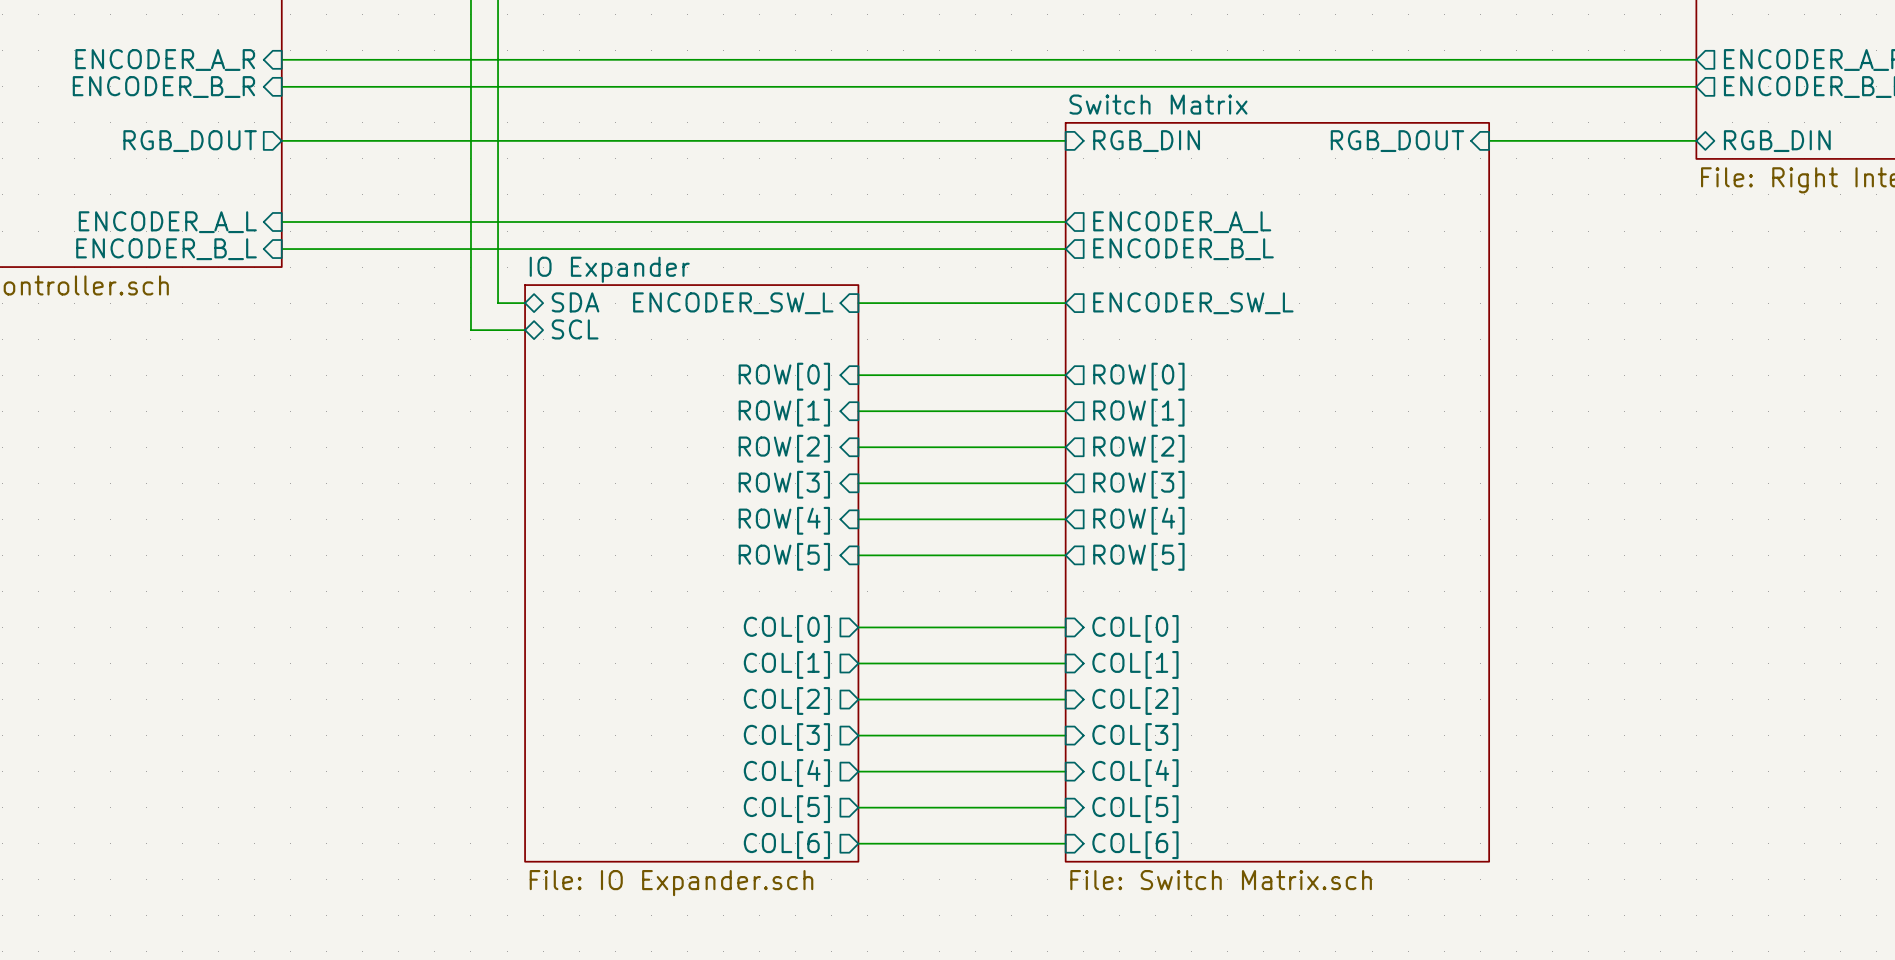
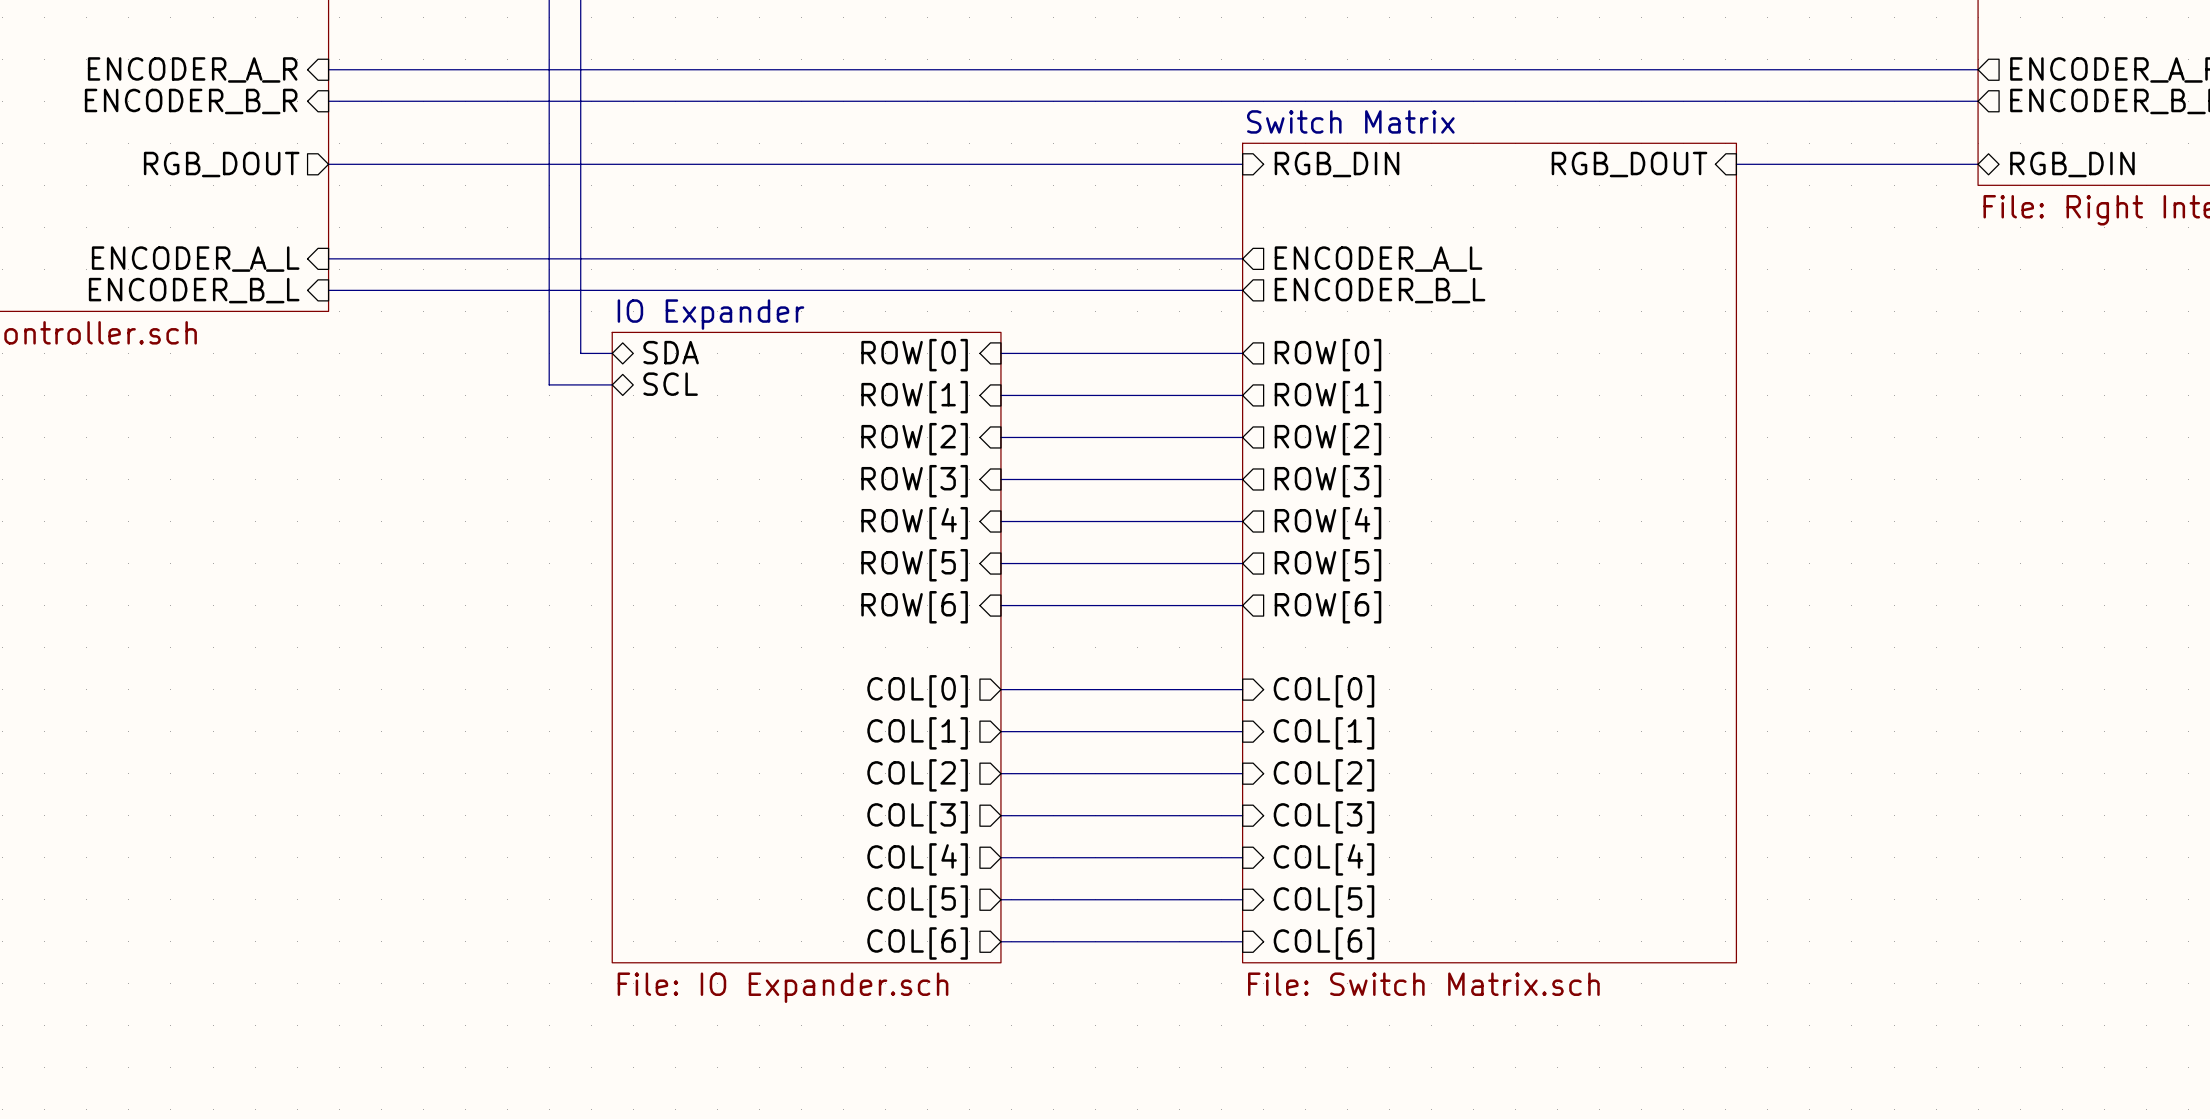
sheet pin: ENCODER_SW_L (733, 303) -> ROW[0] (914, 355)
sheet pin: ENCODER_SW_L (1193, 303) -> ROW[0] (1327, 355)
wire: none -> (1000, 395) (1242, 395)
sheet pin: none -> ROW[1] (914, 397)
sheet pin: none -> ROW[1] (1327, 397)
sheet pin: ROW[0] (784, 376) -> ROW[2] (914, 439)
sheet pin: ROW[0] (1138, 376) -> ROW[2] (1327, 439)
sheet pin: ROW[1] (784, 412) -> ROW[3] (914, 481)
sheet pin: ROW[1] (1138, 412) -> ROW[3] (1327, 481)
sheet pin: ROW[2] (784, 448) -> ROW[4] (914, 523)
sheet pin: ROW[2] (1138, 448) -> ROW[4] (1327, 523)
sheet Switch Matrix: none -> File: Switch Matrix.sch (1489, 553)
sheet pin: ROW[3] (784, 484) -> ROW[5] (914, 565)
sheet pin: ROW[3] (1138, 484) -> ROW[5] (1327, 565)
sheet Switch Matrix: File: Switch Matrix.sch (1277, 492) -> none
sheet pin: ROW[4] (784, 520) -> ROW[6] (914, 607)
sheet pin: ROW[4] (1138, 520) -> ROW[6] (1327, 607)
sheet IO Expander: none -> File: IO Expander.sch (806, 647)
wire: (858, 555) (1065, 555) -> (1000, 689) (1242, 689)
sheet pin: ROW[5] (784, 556) -> none
sheet pin: ROW[5] (1138, 556) -> none
sheet IO Expander: File: IO Expander.sch (691, 573) -> none
sheet pin: none -> COL[0] (917, 691)
sheet pin: none -> COL[0] (1323, 691)
sheet pin: COL[0] (786, 628) -> COL[1] (917, 733)
sheet pin: COL[0] (1135, 628) -> COL[1] (1323, 733)
sheet pin: COL[1] (786, 664) -> COL[2] (917, 775)
sheet pin: COL[1] (1135, 664) -> COL[2] (1323, 775)
sheet pin: COL[2] (786, 701) -> COL[3] (917, 817)
sheet pin: COL[2] (1135, 701) -> COL[3] (1323, 817)
sheet pin: COL[3] (786, 737) -> COL[4] (917, 859)
sheet pin: COL[3] (1135, 737) -> COL[4] (1323, 859)
sheet pin: COL[4] (786, 773) -> COL[5] (917, 901)
sheet pin: COL[4] (1135, 773) -> COL[5] (1323, 901)
sheet pin: COL[5] (786, 809) -> COL[6] (917, 943)
sheet pin: COL[5] (1135, 809) -> COL[6] (1323, 943)
wire: (858, 843) (1065, 843) -> none
sheet pin: COL[6] (786, 845) -> none
sheet pin: COL[6] (1135, 845) -> none

